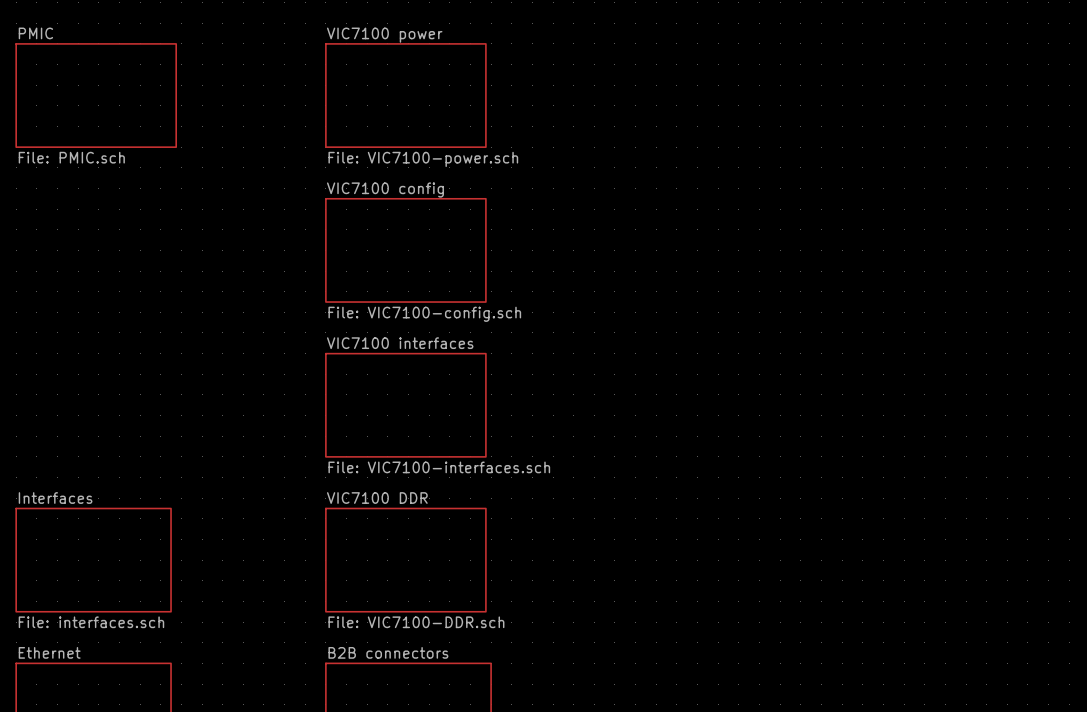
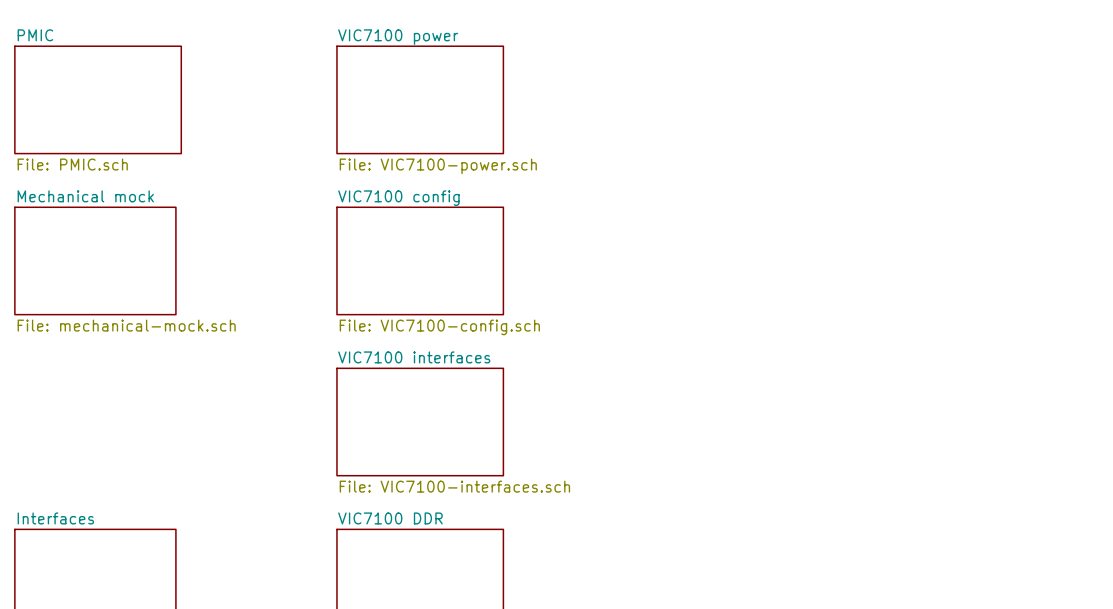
sheet Mechanical mock: none -> File: mechanical-mock.sch (95, 260)

